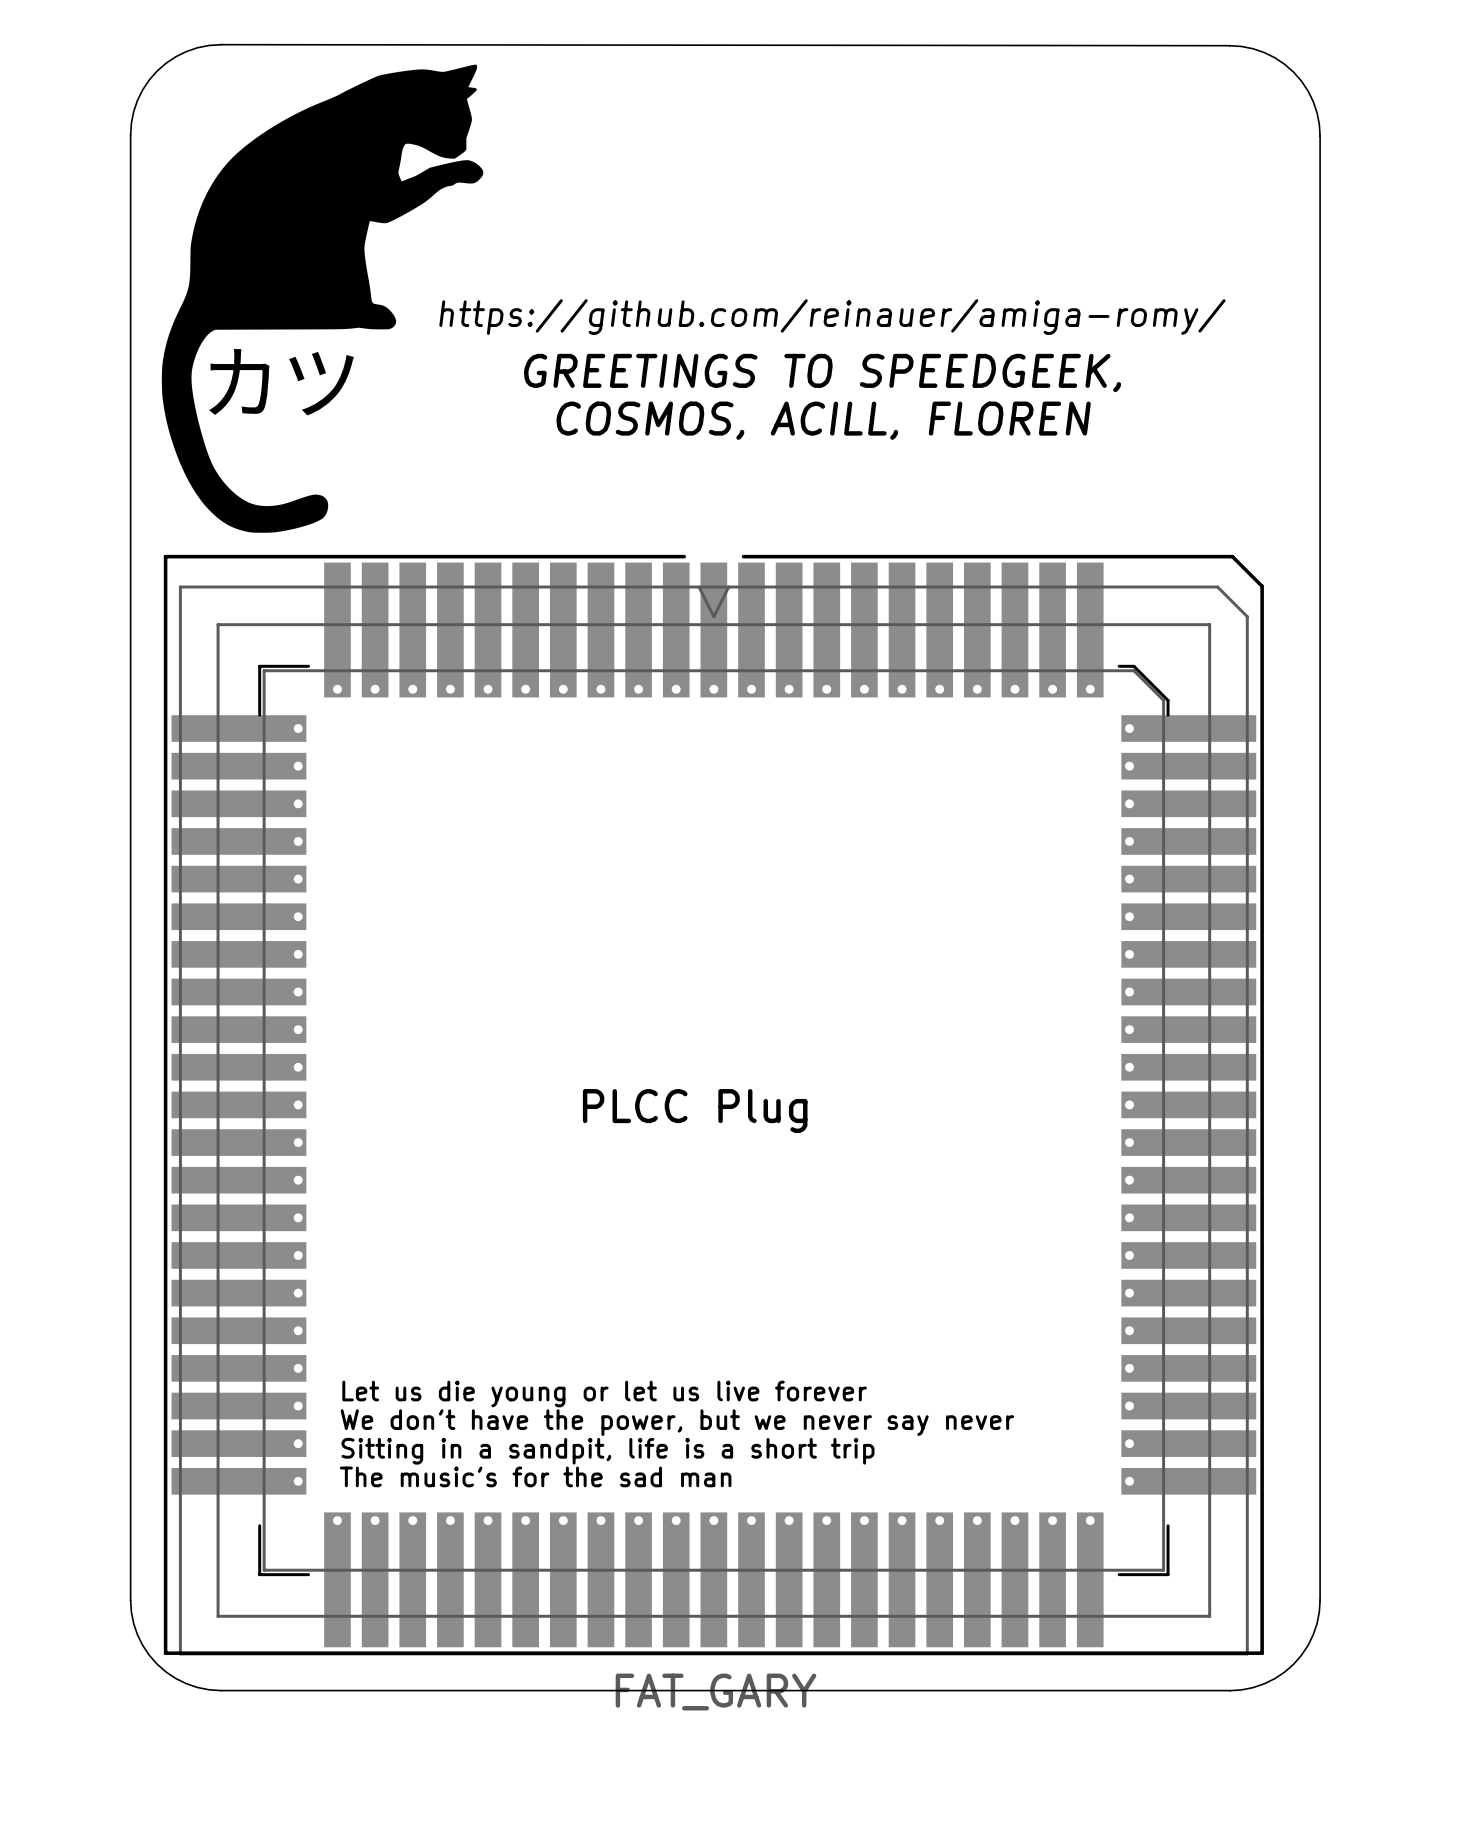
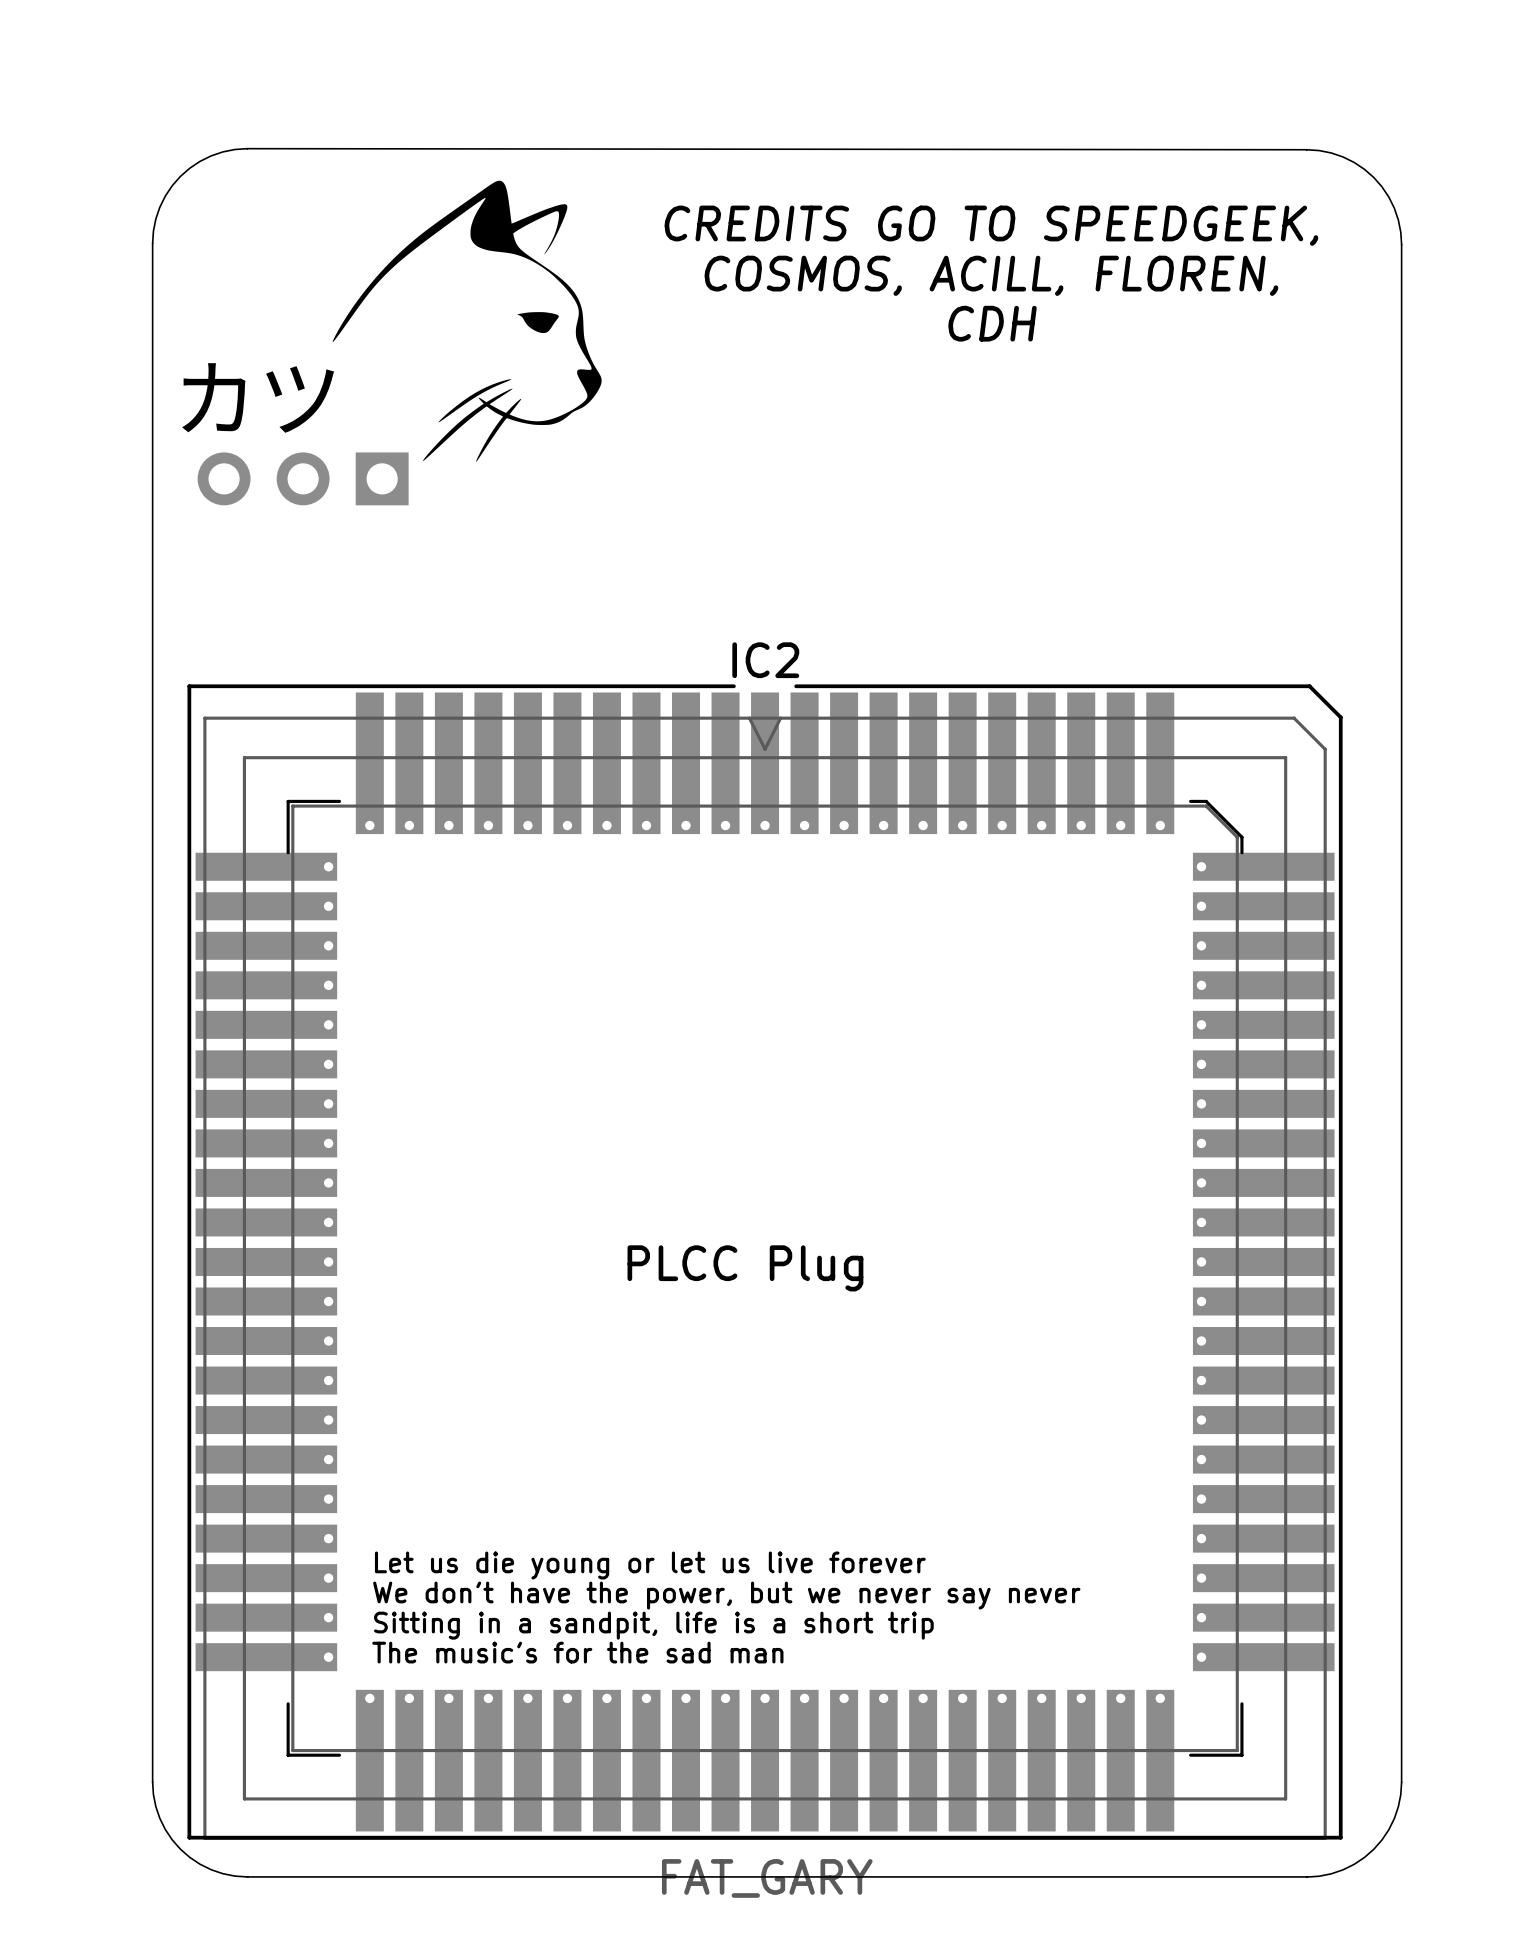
drawing: [161, 64, 484, 533] -> none
drawing: none -> [332, 180, 602, 462]
text: none -> CREDITS GO TO SPEEDGEEK, (991, 225)
text: none -> COSMOS, ACILL, FLOREN, (991, 275)
text: none -> CDH (992, 323)
text: https://github.com/reinauer/amiga-romy/ (832, 317) -> none
part: none -> (303, 478)
text: GREETINGS TO SPEEDGEEK, (822, 372) -> none
text position: カツ (281, 382) -> カツ (258, 397)
text: COSMOS, ACILL, FLOREN (823, 420) -> none
IC2 name: none -> IC2 (765, 660)

